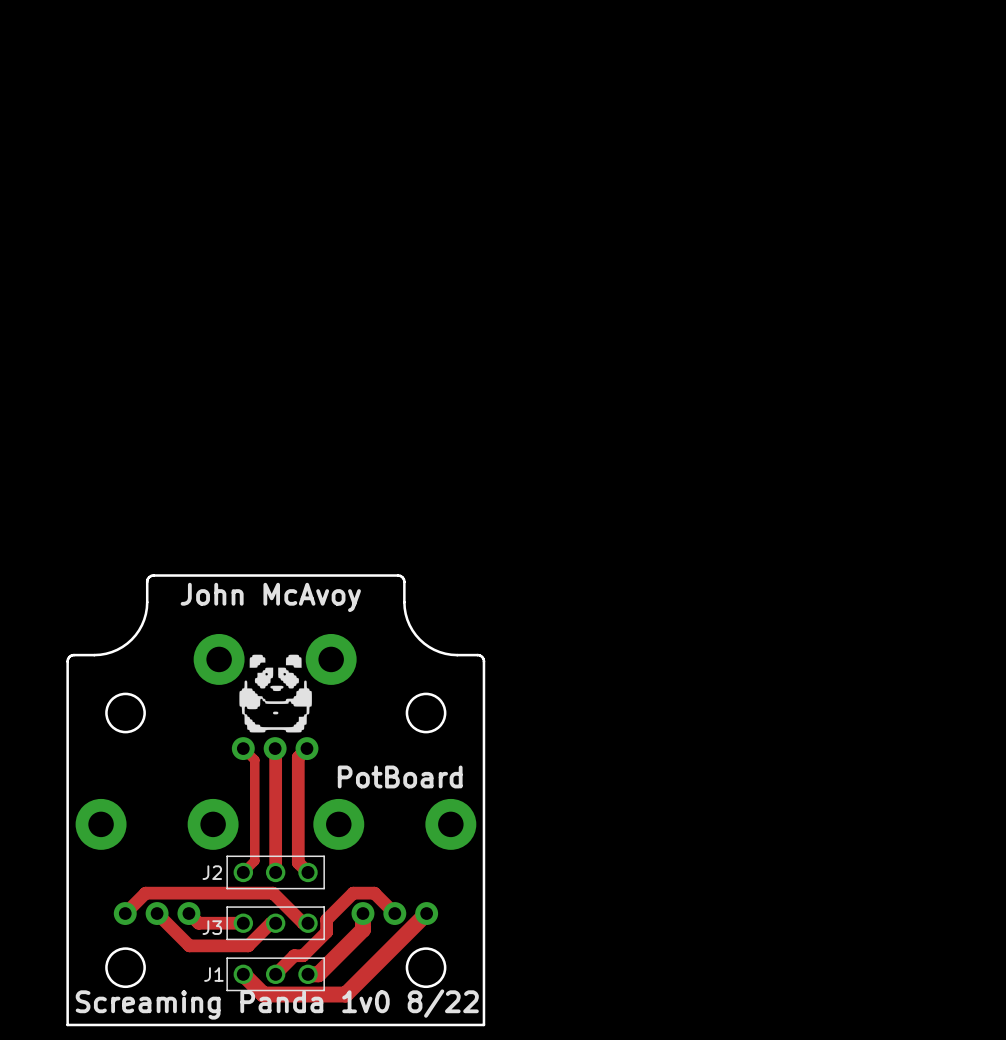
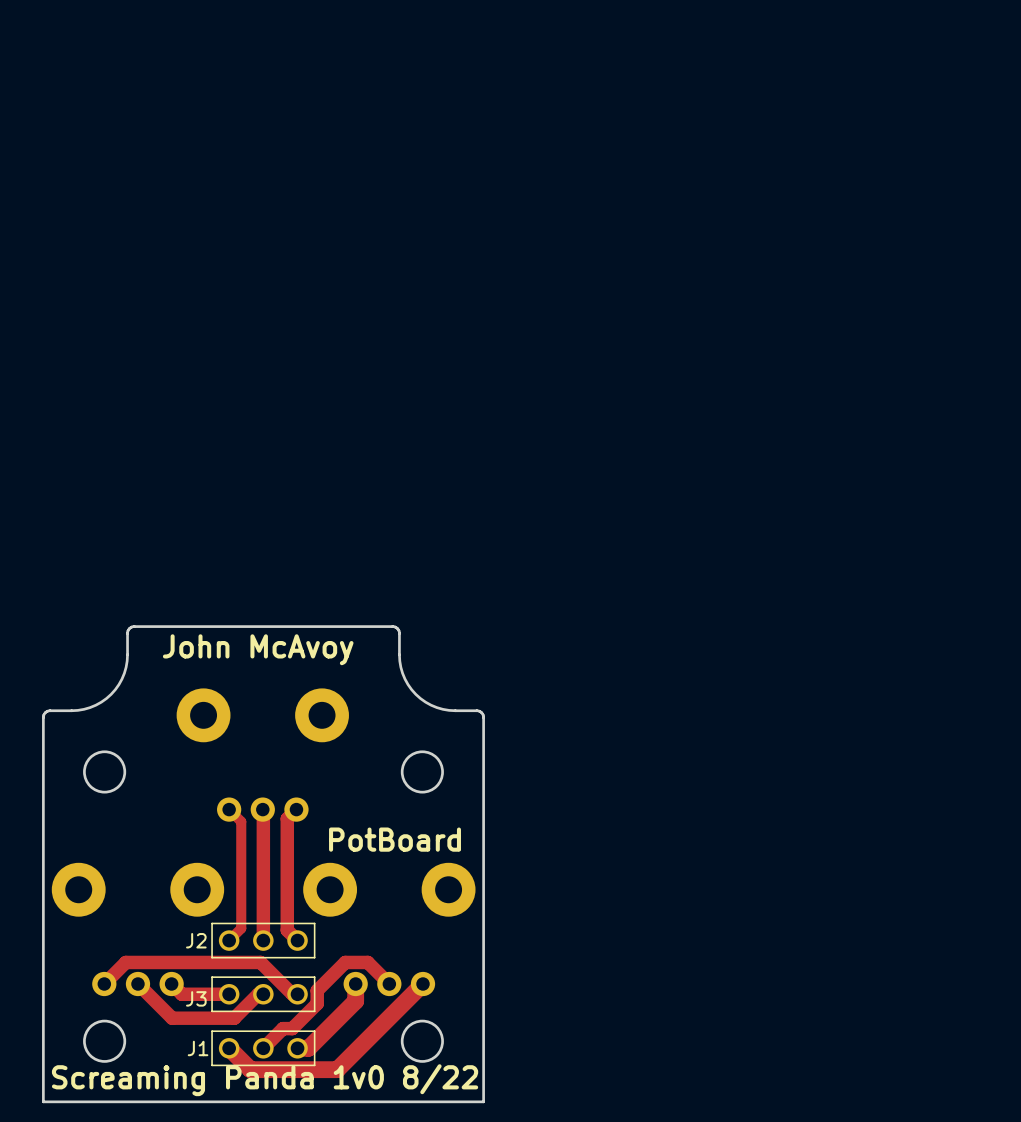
drawing: [239, 654, 312, 733] -> none

